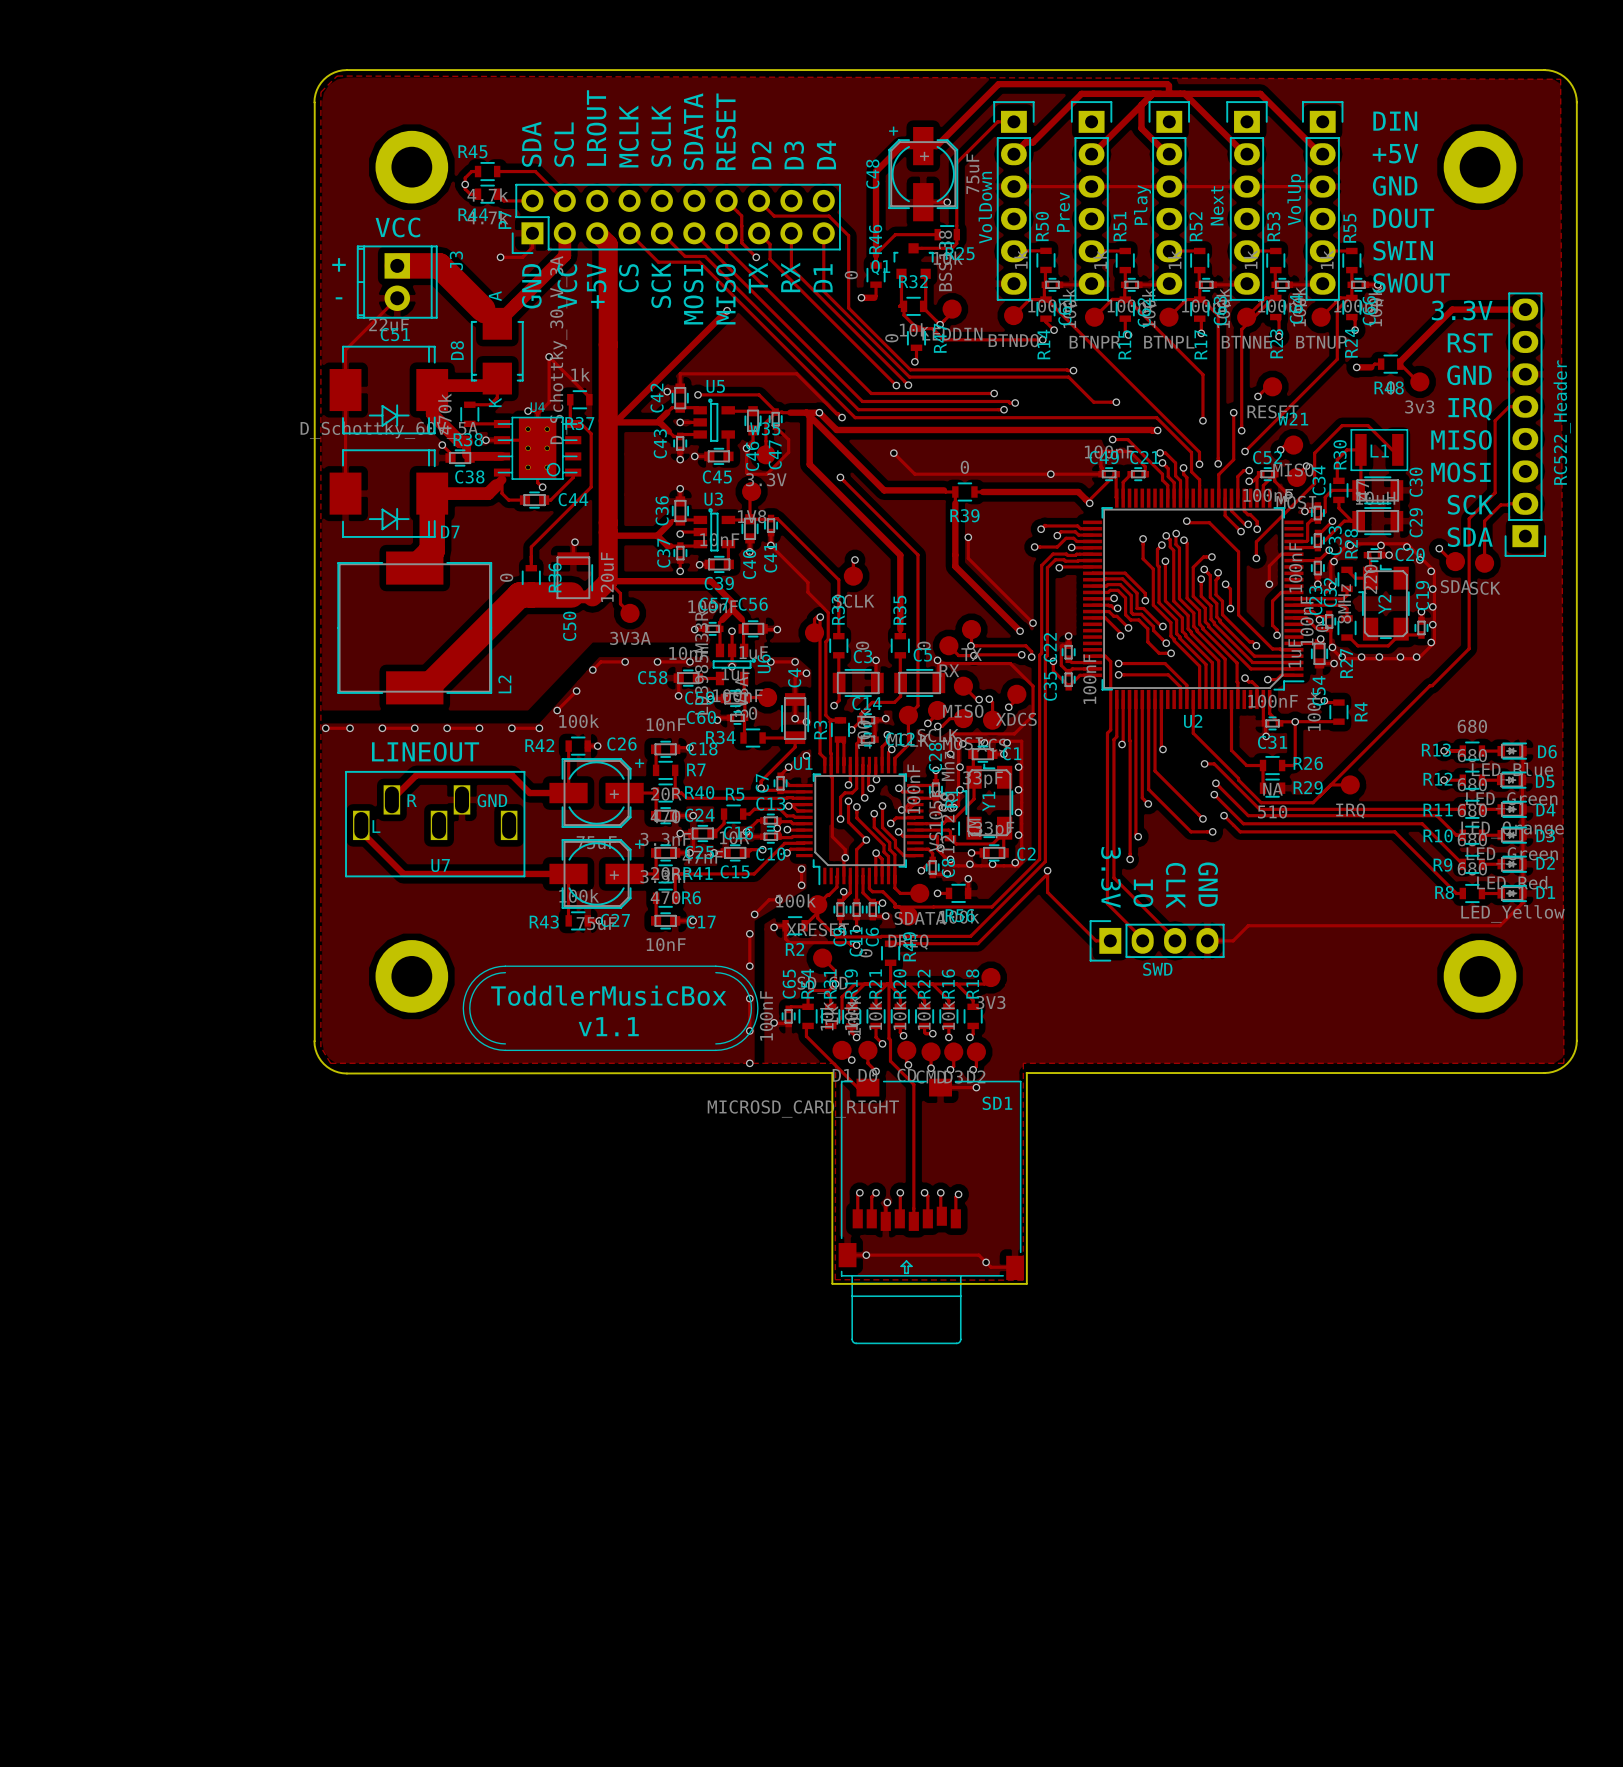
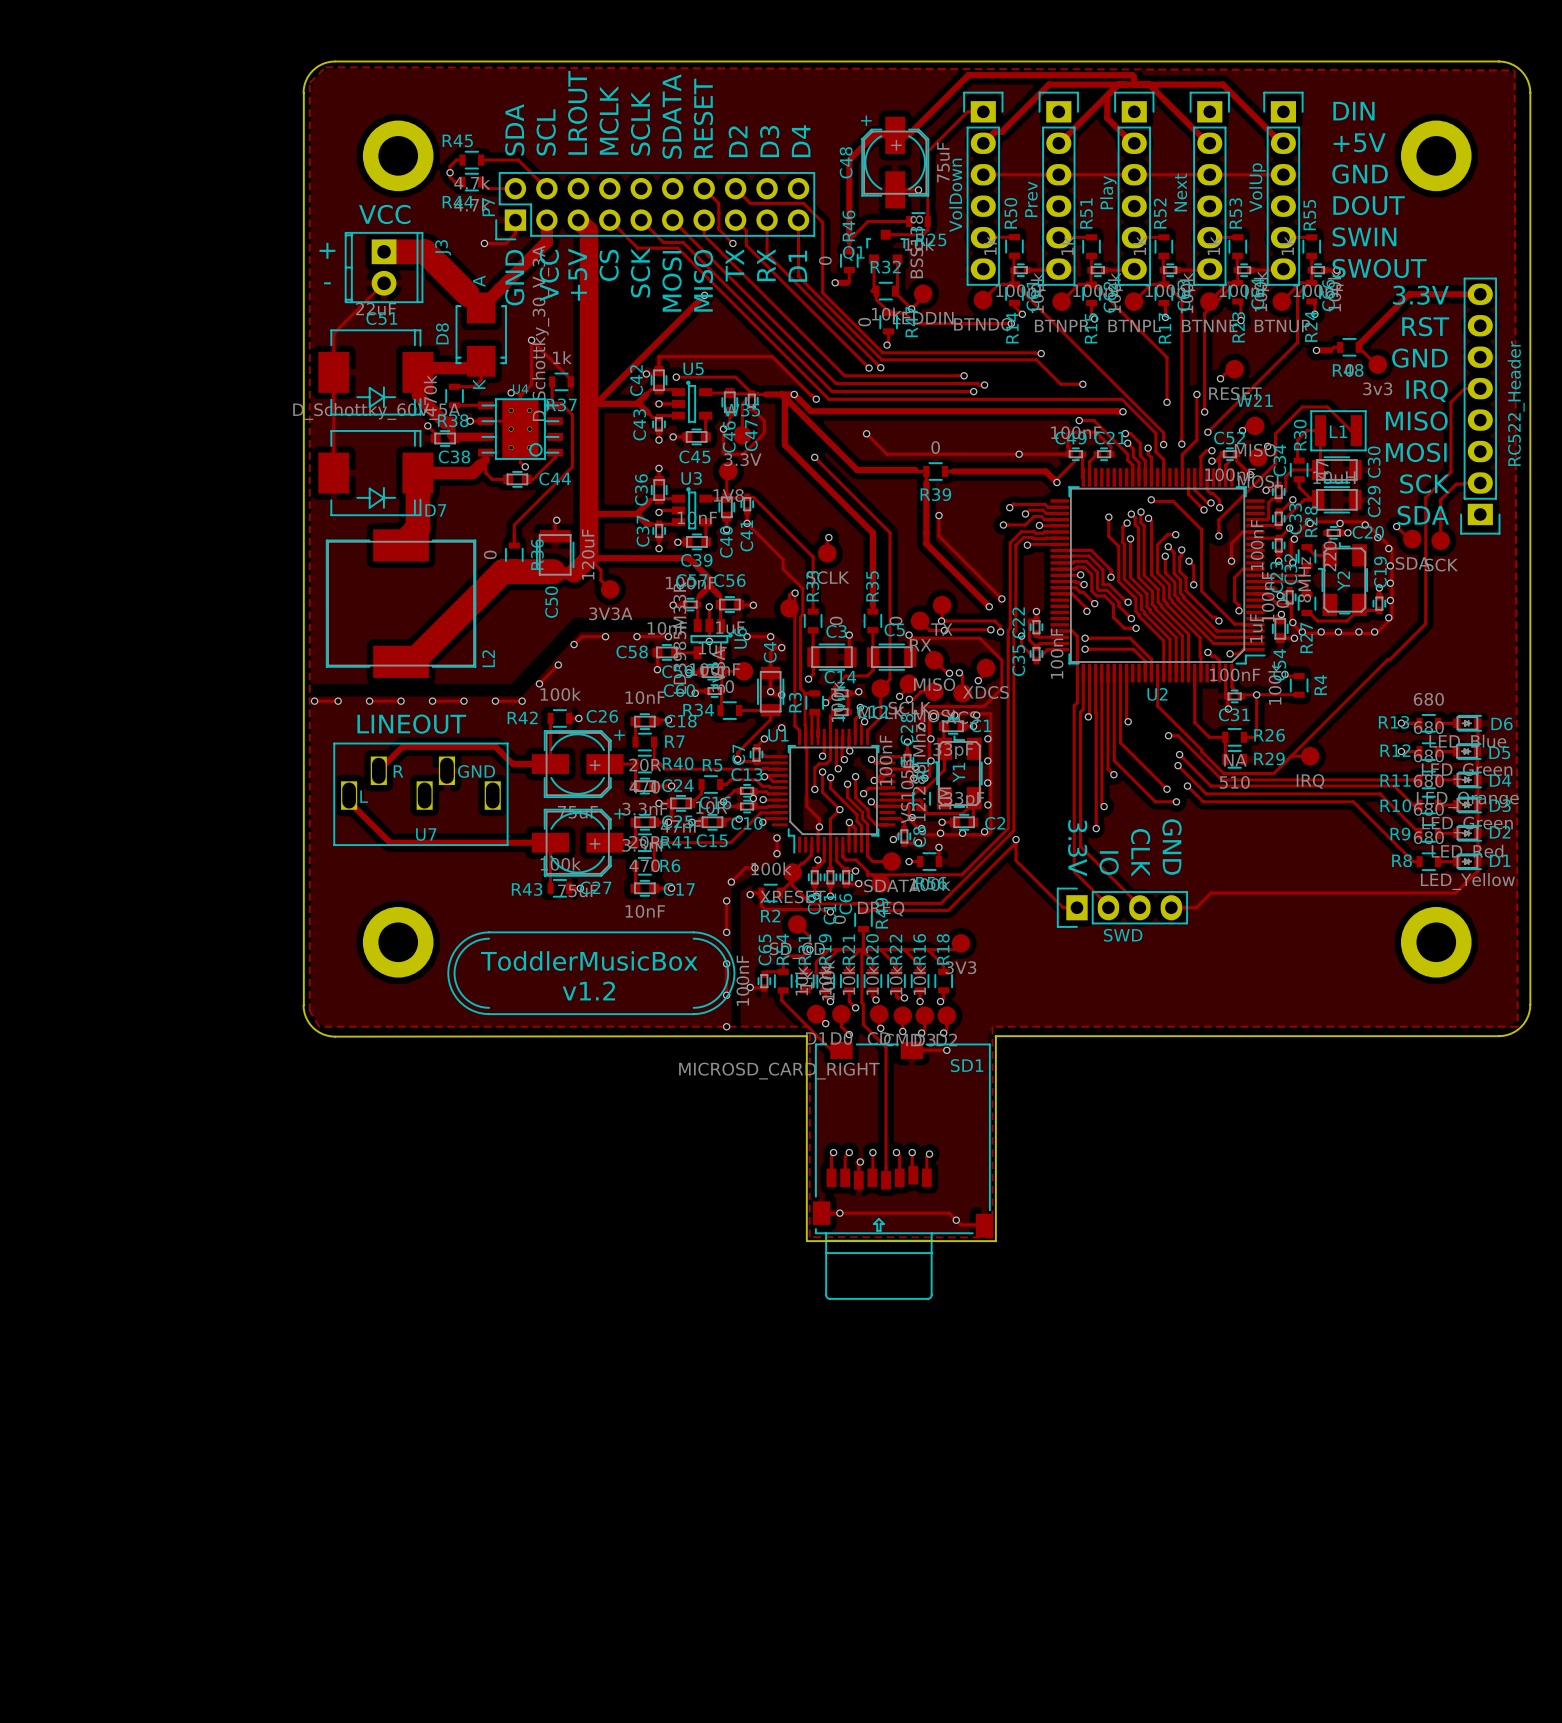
text: v1.1 (608, 1026) -> v1.2 (588, 990)

